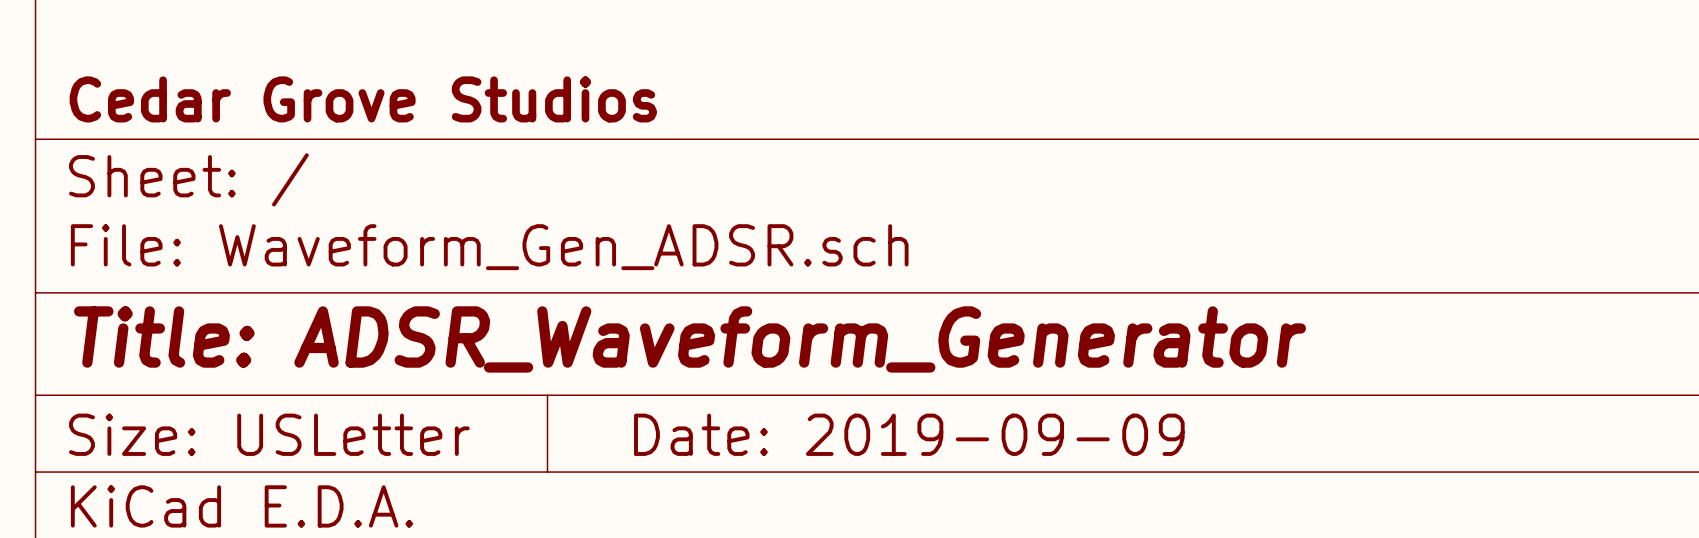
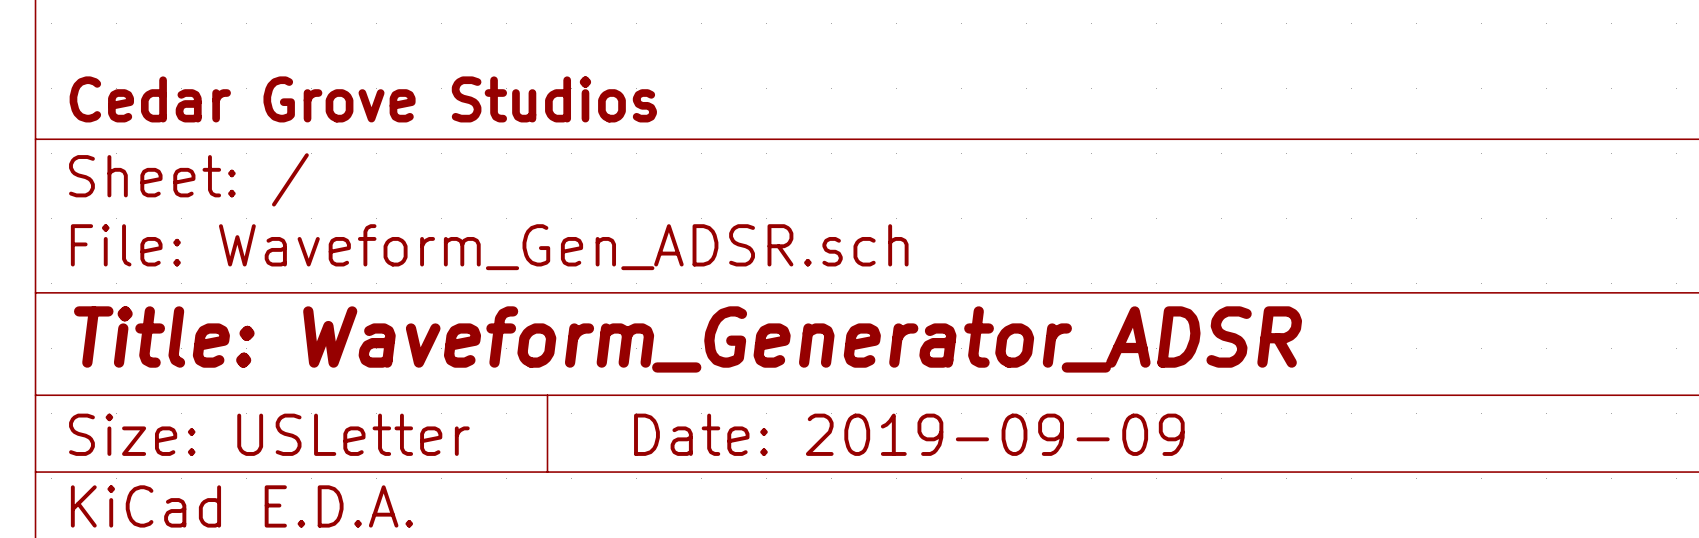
title block: Title: ADSR_Waveform_Generator (689, 339) -> Title: Waveform_Generator_ADSR (688, 339)

